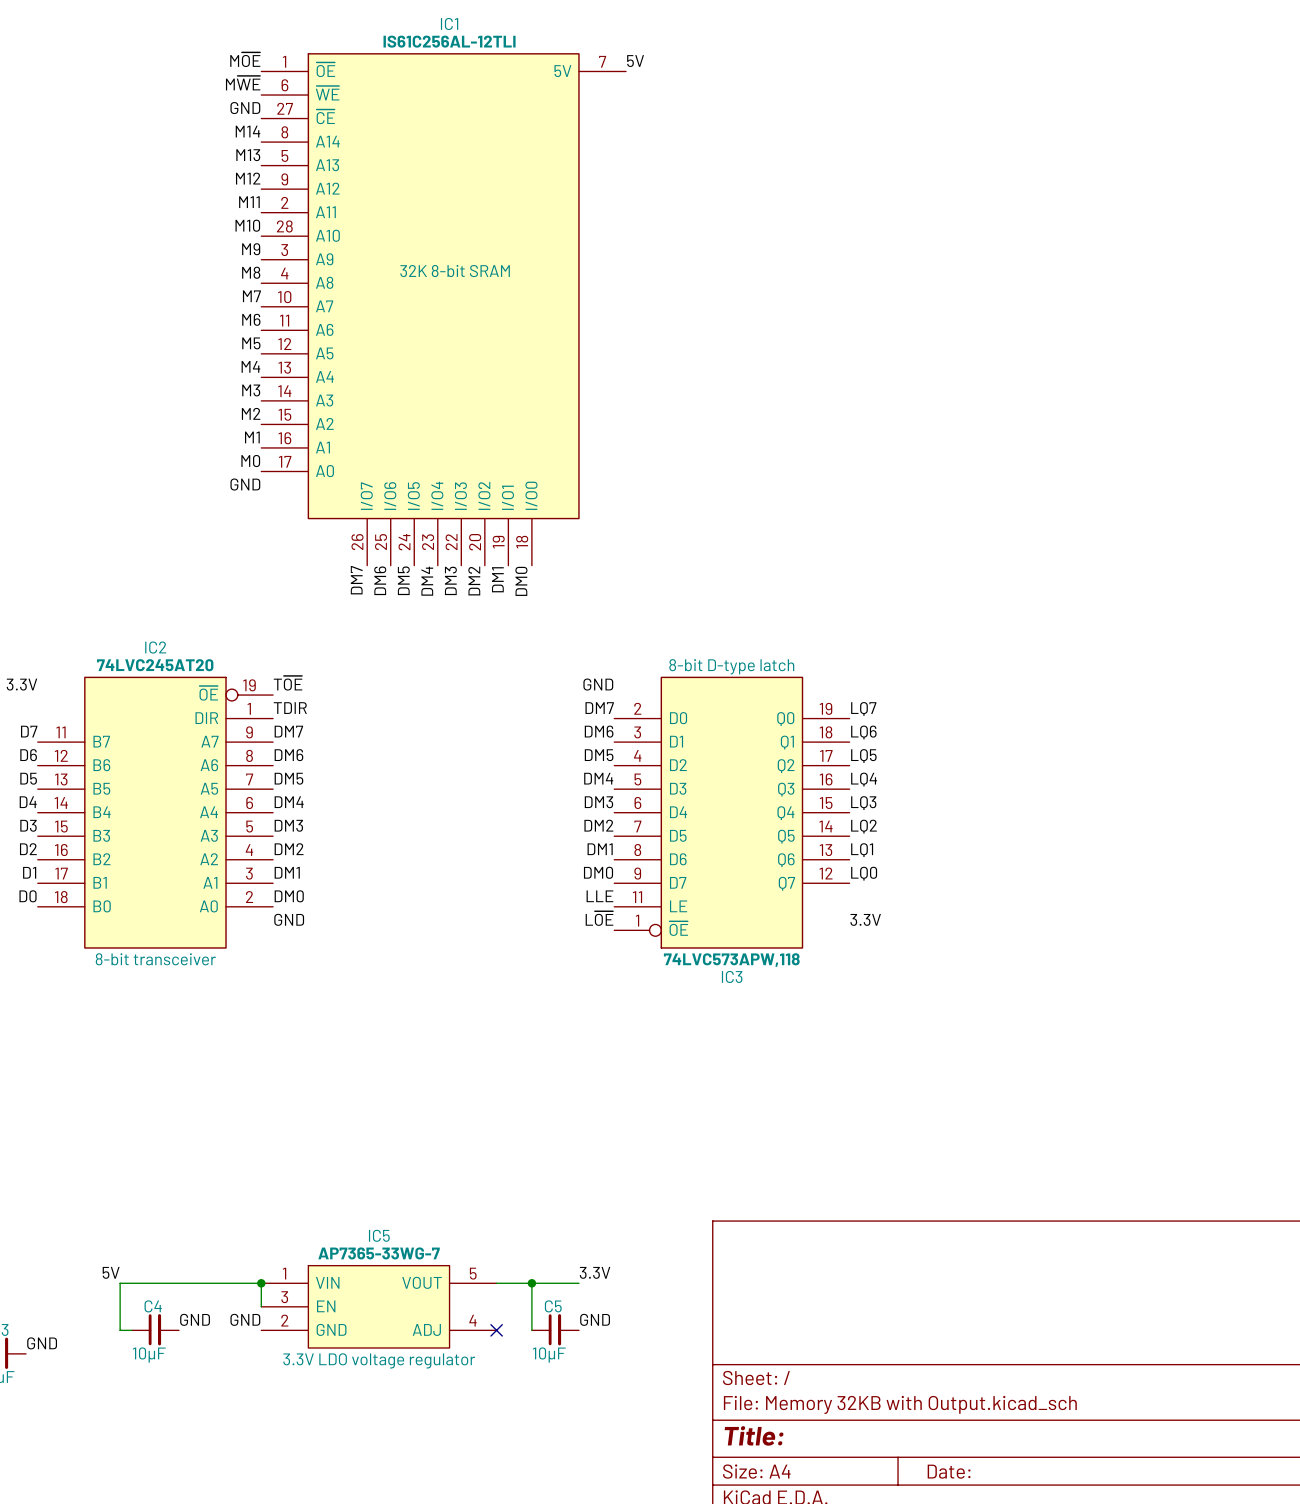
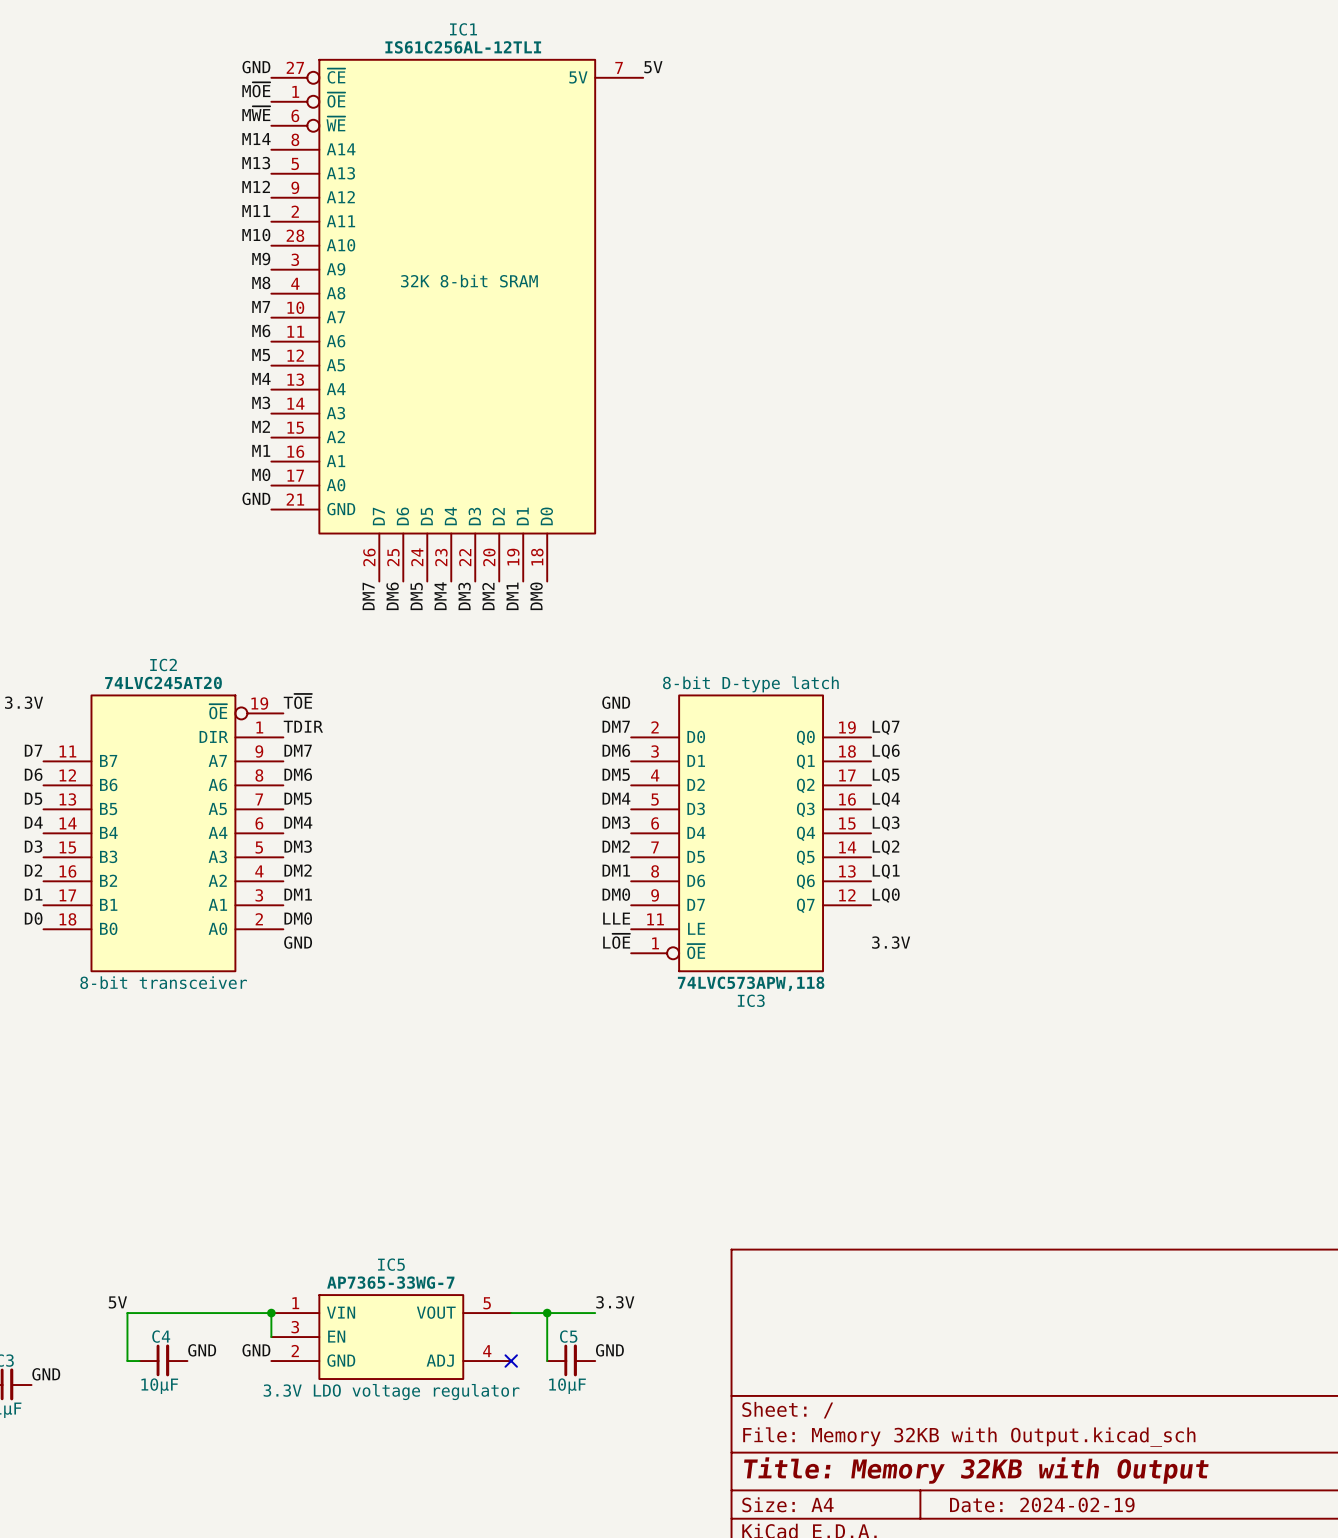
IC1 symbol: [261, 53, 627, 566] -> [271, 59, 644, 582]
label: M~{OE} (245, 59) -> GND (256, 67)
label: M~{WE} (243, 83) -> M~{OE} (256, 89)
label: GND (245, 108) -> M~{WE} (256, 113)
title block: Title: (754, 1435) -> Title: Memory 32KB with Output (976, 1470)
title block: Date: (949, 1471) -> Date: 2024-02-19 (1042, 1504)

